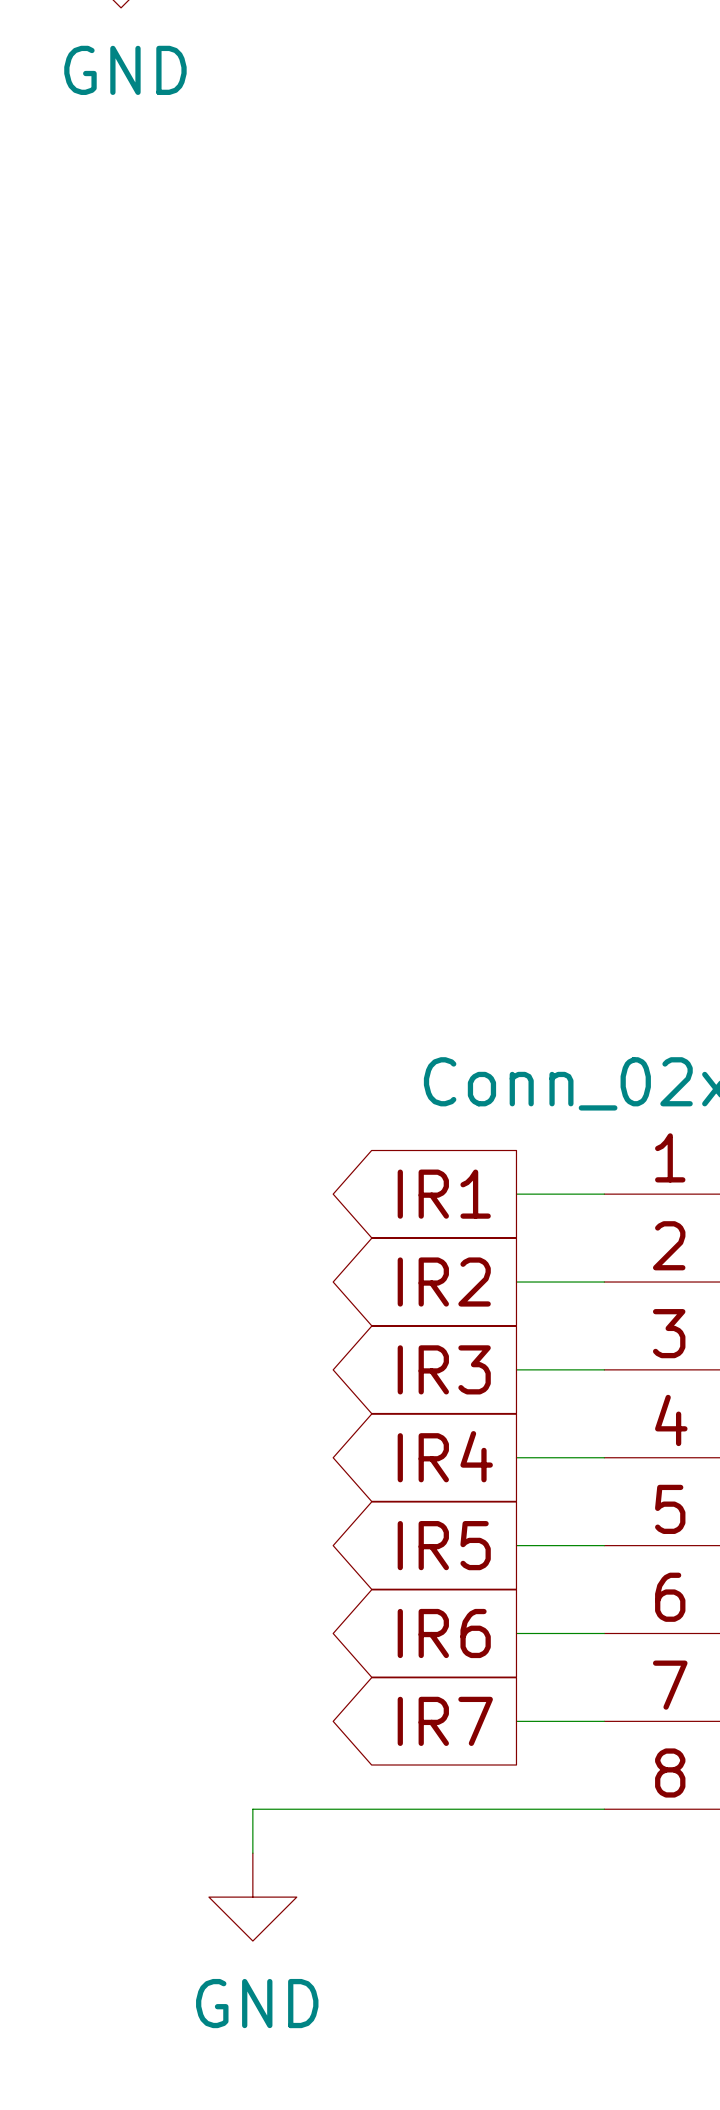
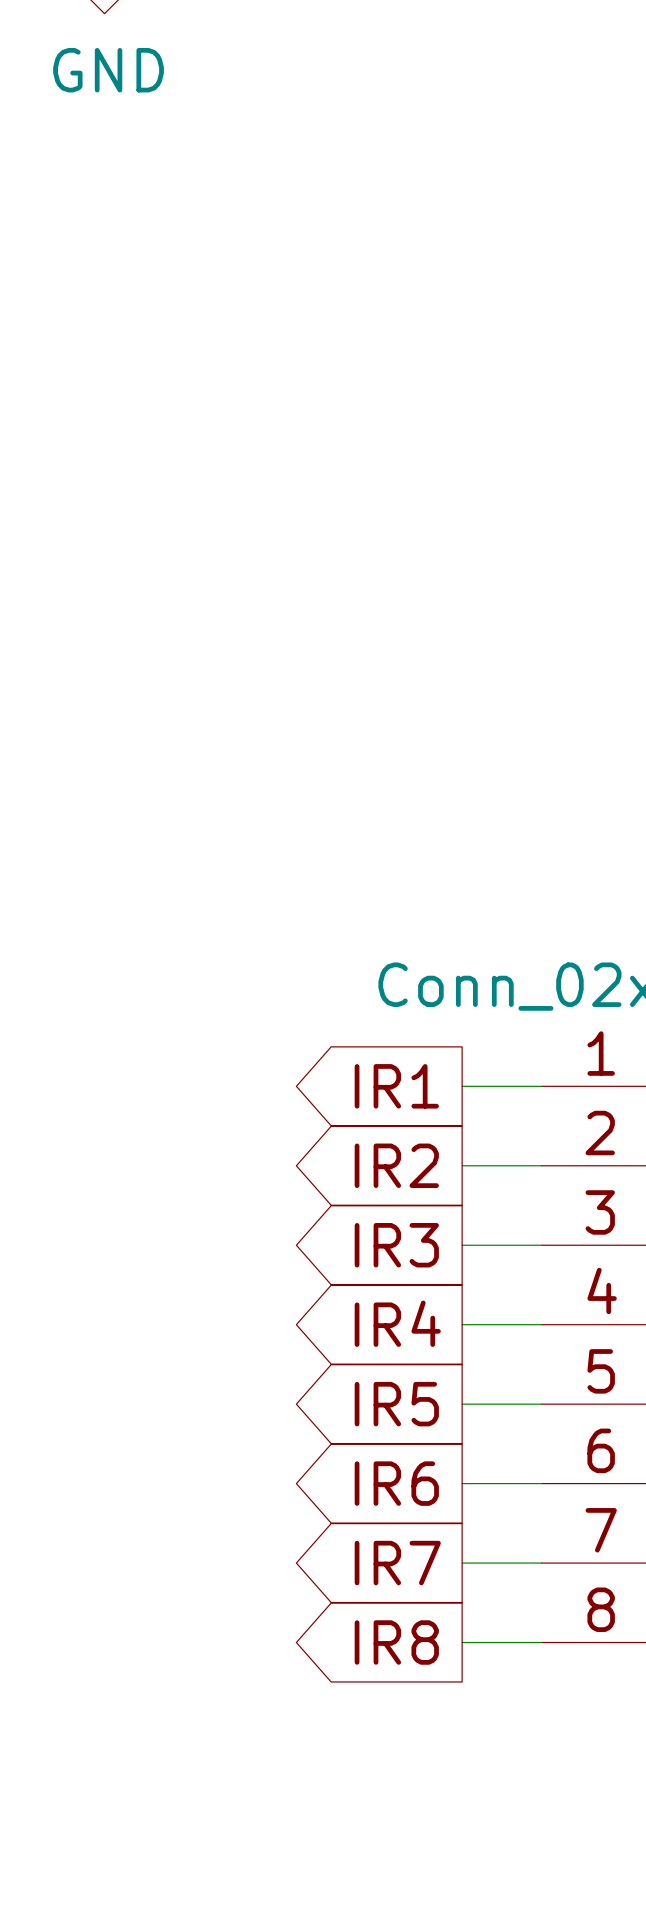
global label: none -> IR8 (396, 1642)
wire: (516, 1809) (252, 1809) (252, 1853) -> none
power symbol: GND (252, 1897) -> none

